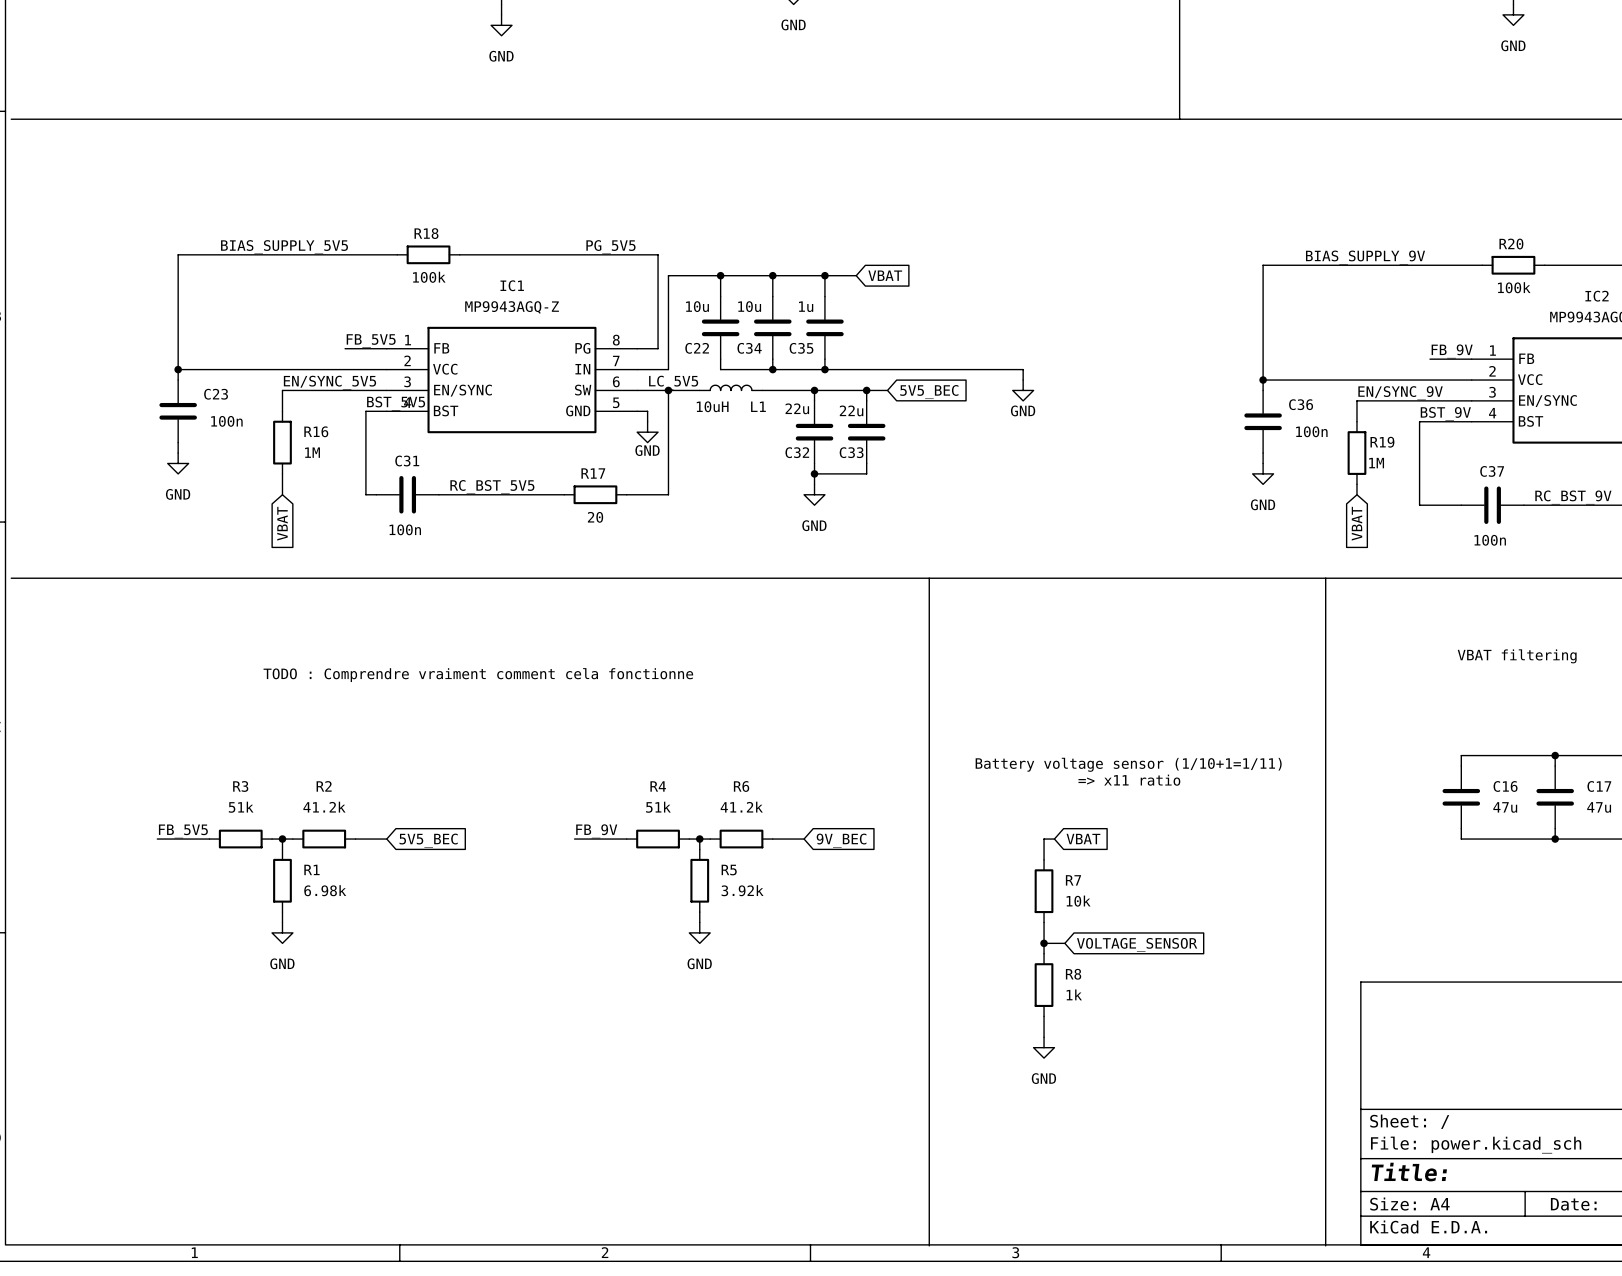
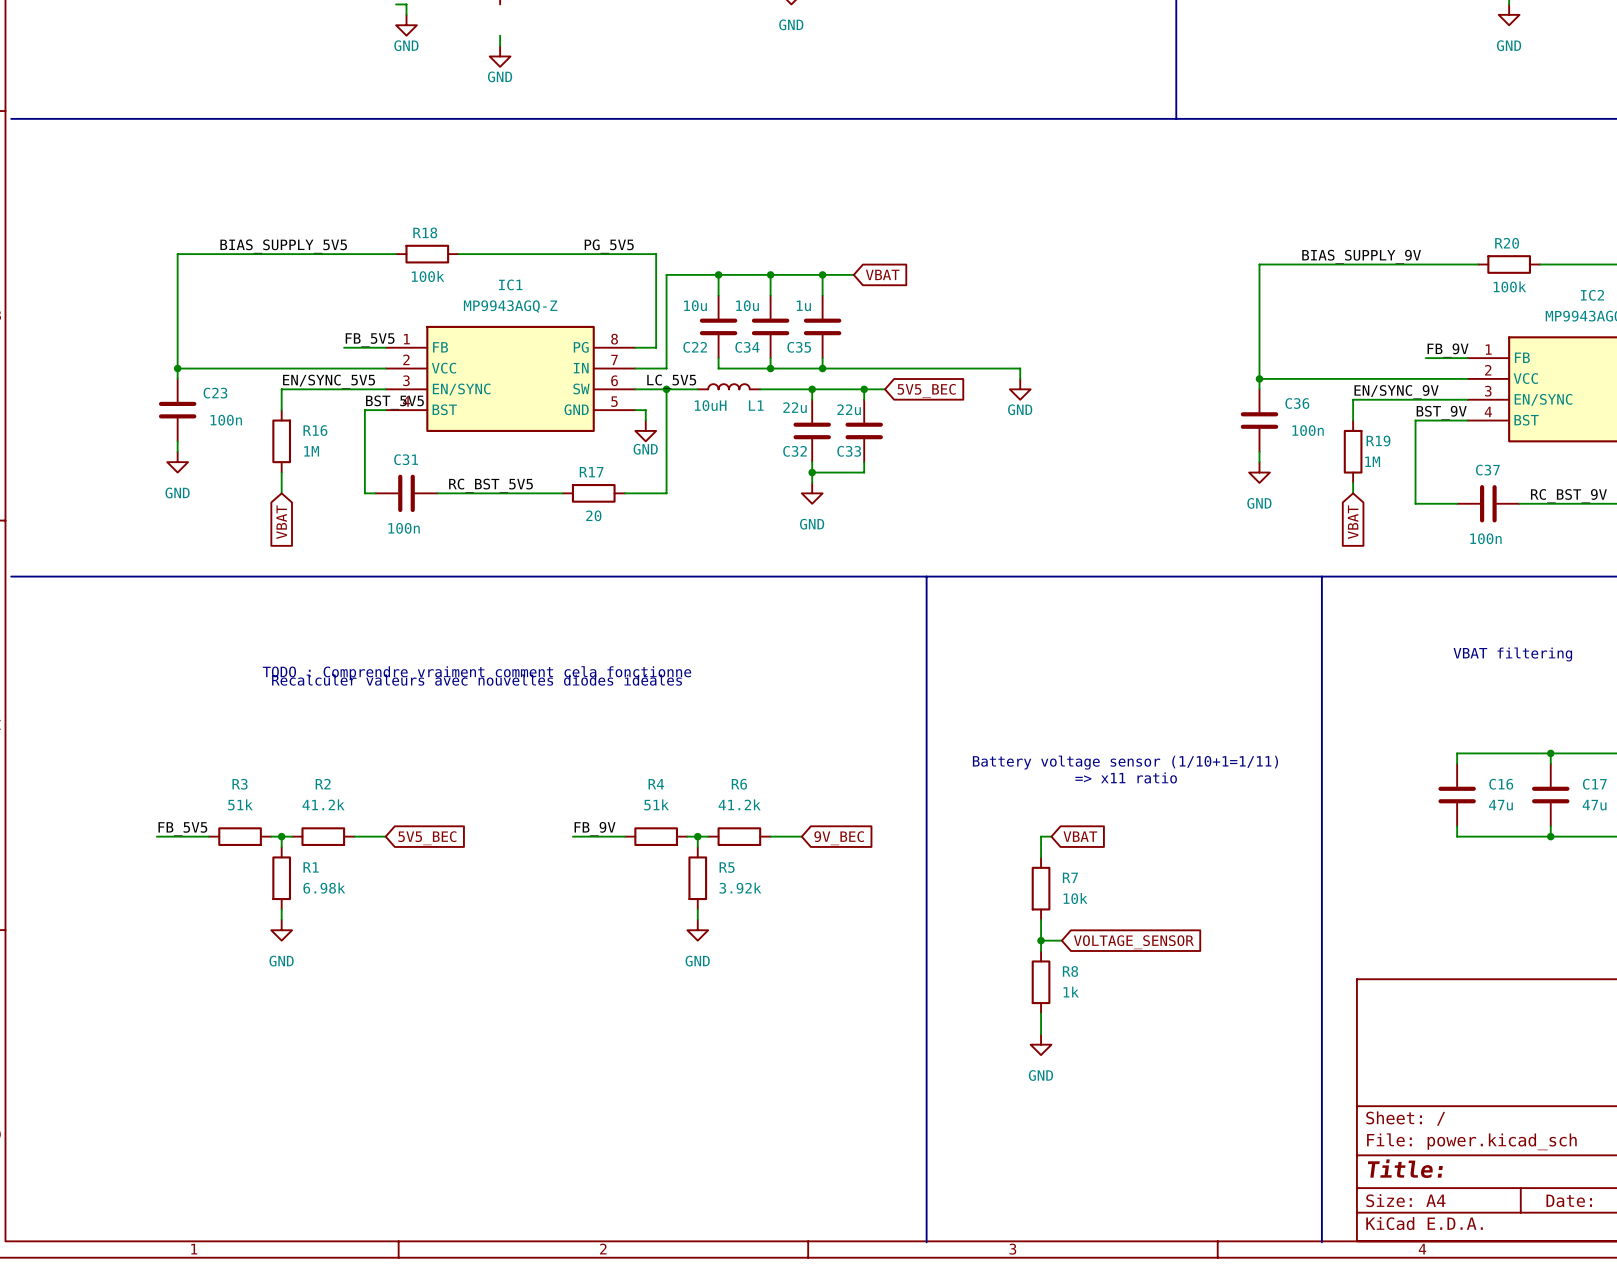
wire: none -> (396, 4) (406, 4) (406, 14)
wire: (501, 4) (501, 14) -> (500, 35) (500, 46)
power symbol: none -> GND (406, 25)
power symbol position: GND (501, 25) -> GND (500, 56)
power symbol text position: GND (501, 56) -> GND (500, 76)
text: none -> Recalculer valeurs avec nouvelles diodes idéales (477, 679)

